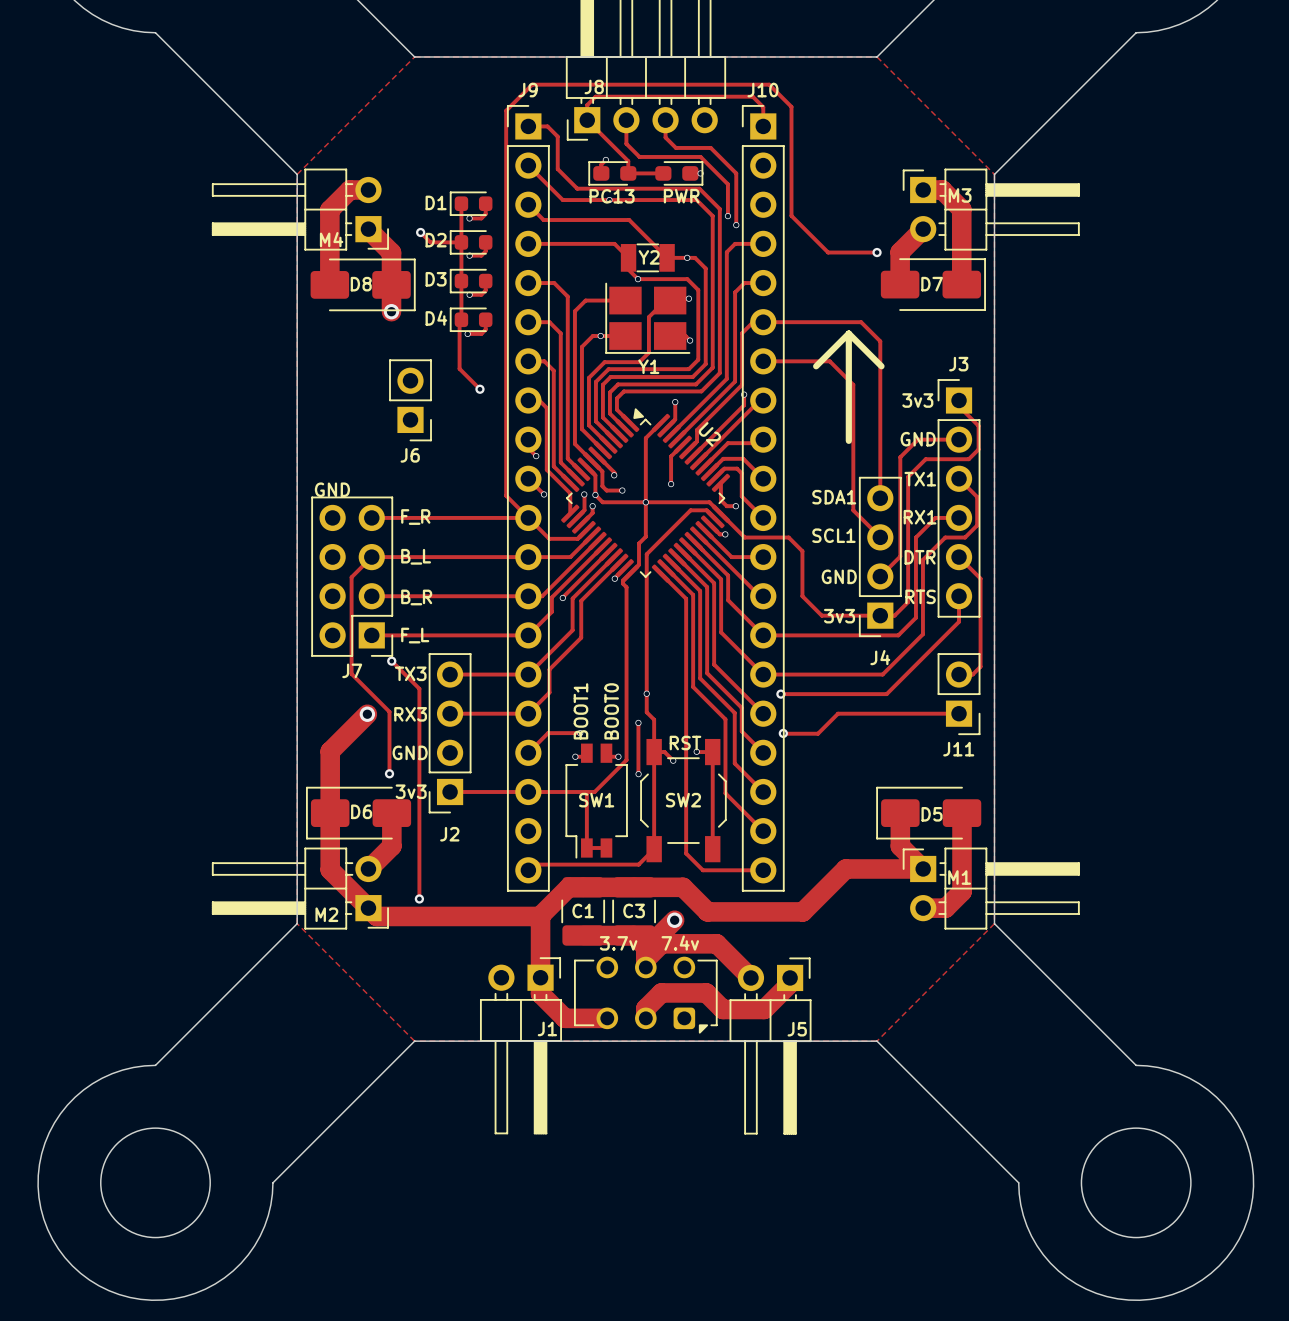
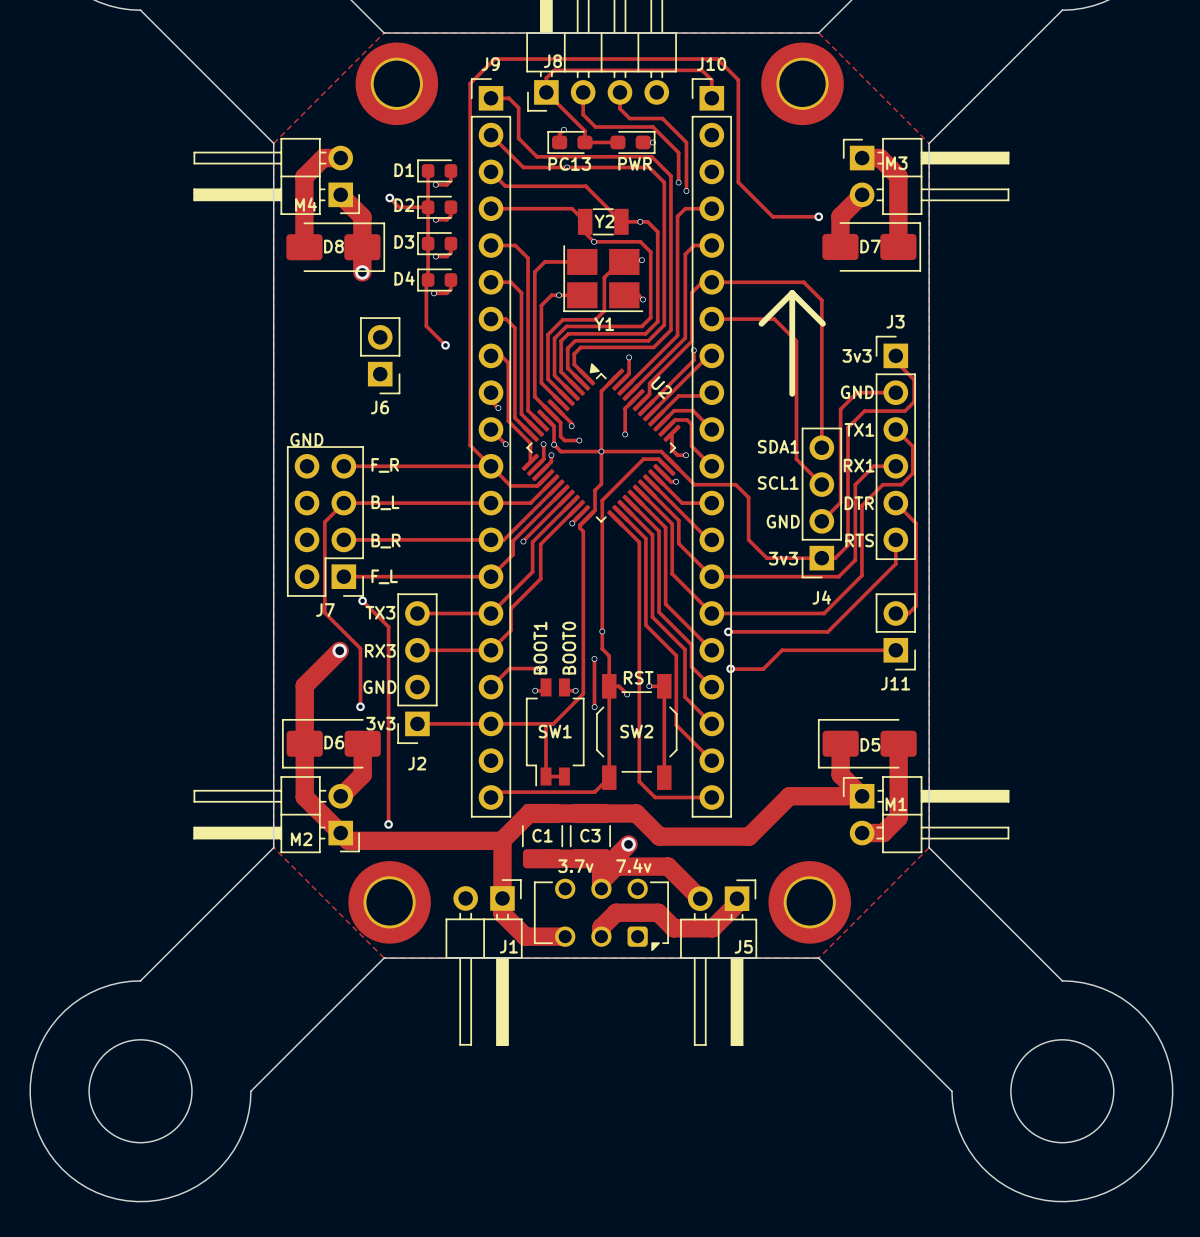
part: none -> (396, 83)
part: none -> (802, 83)
part: none -> (389, 902)
part: none -> (809, 902)

